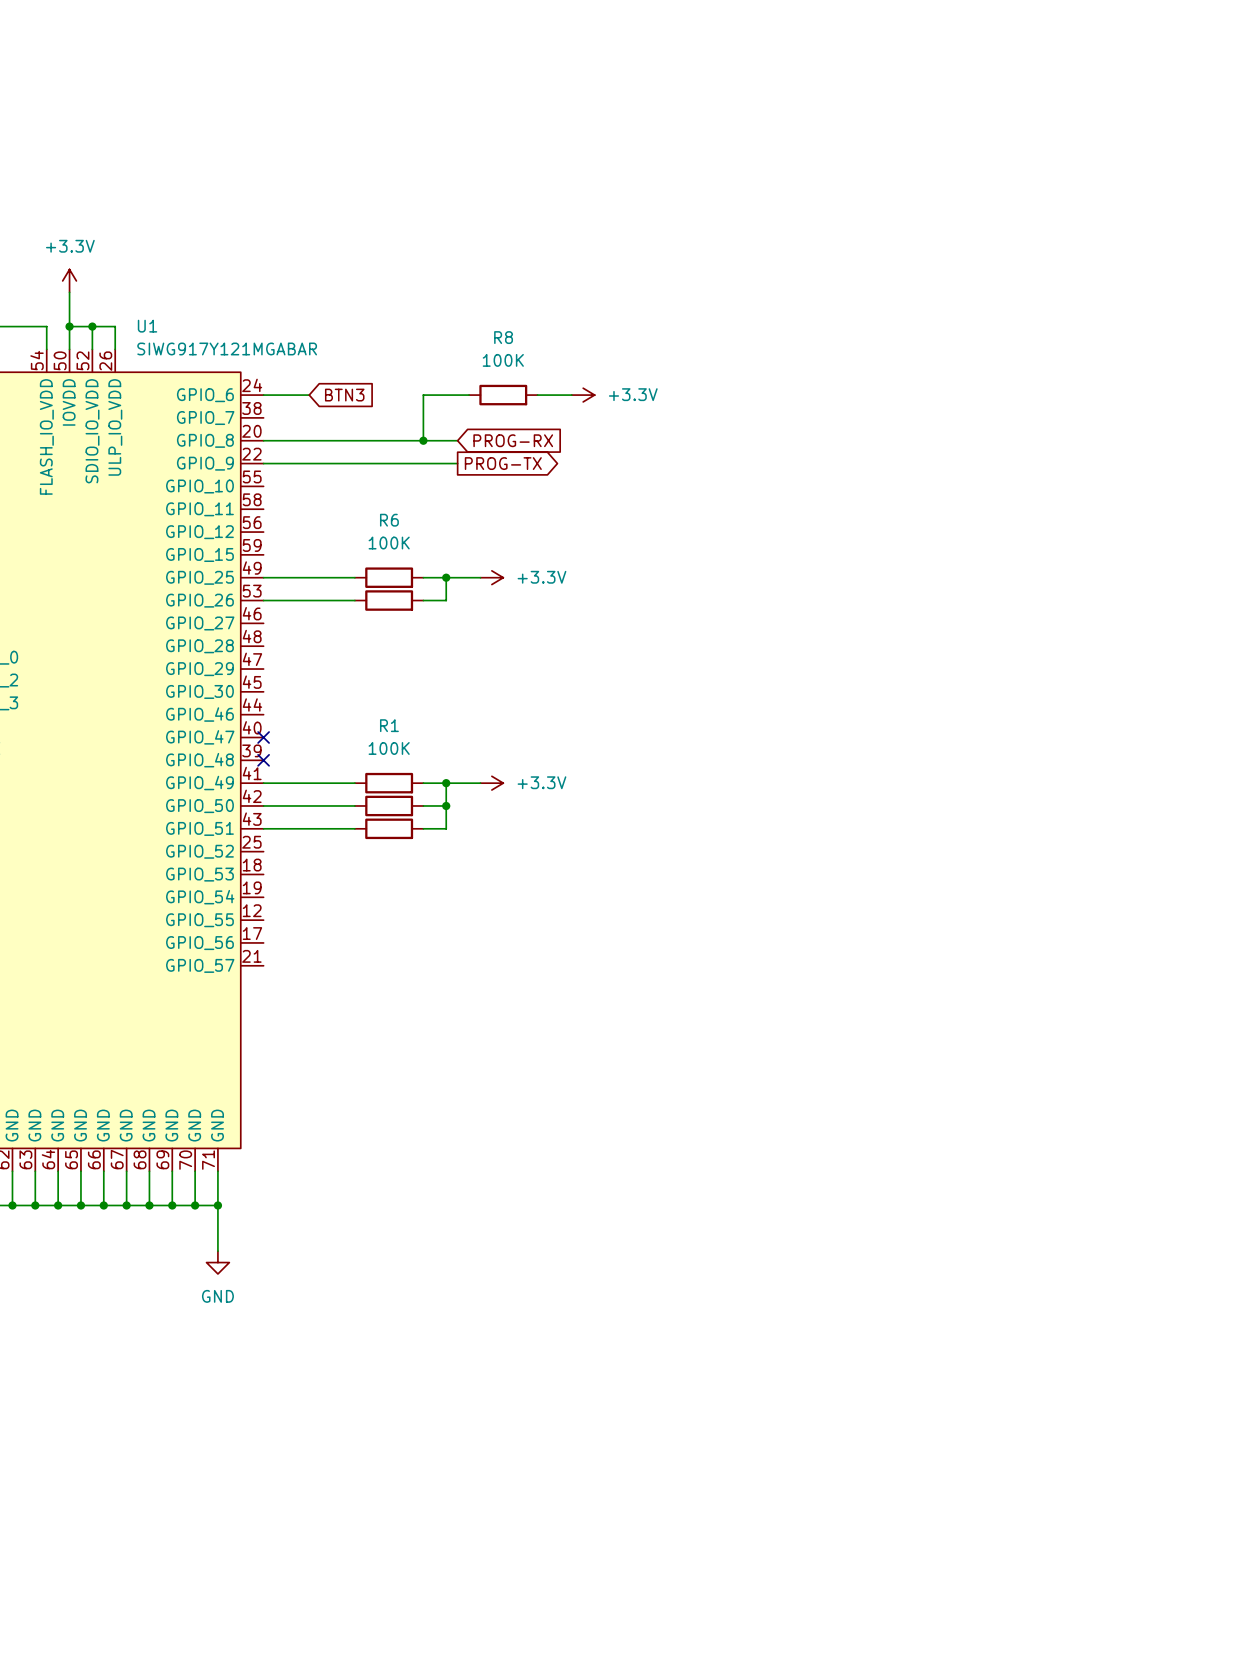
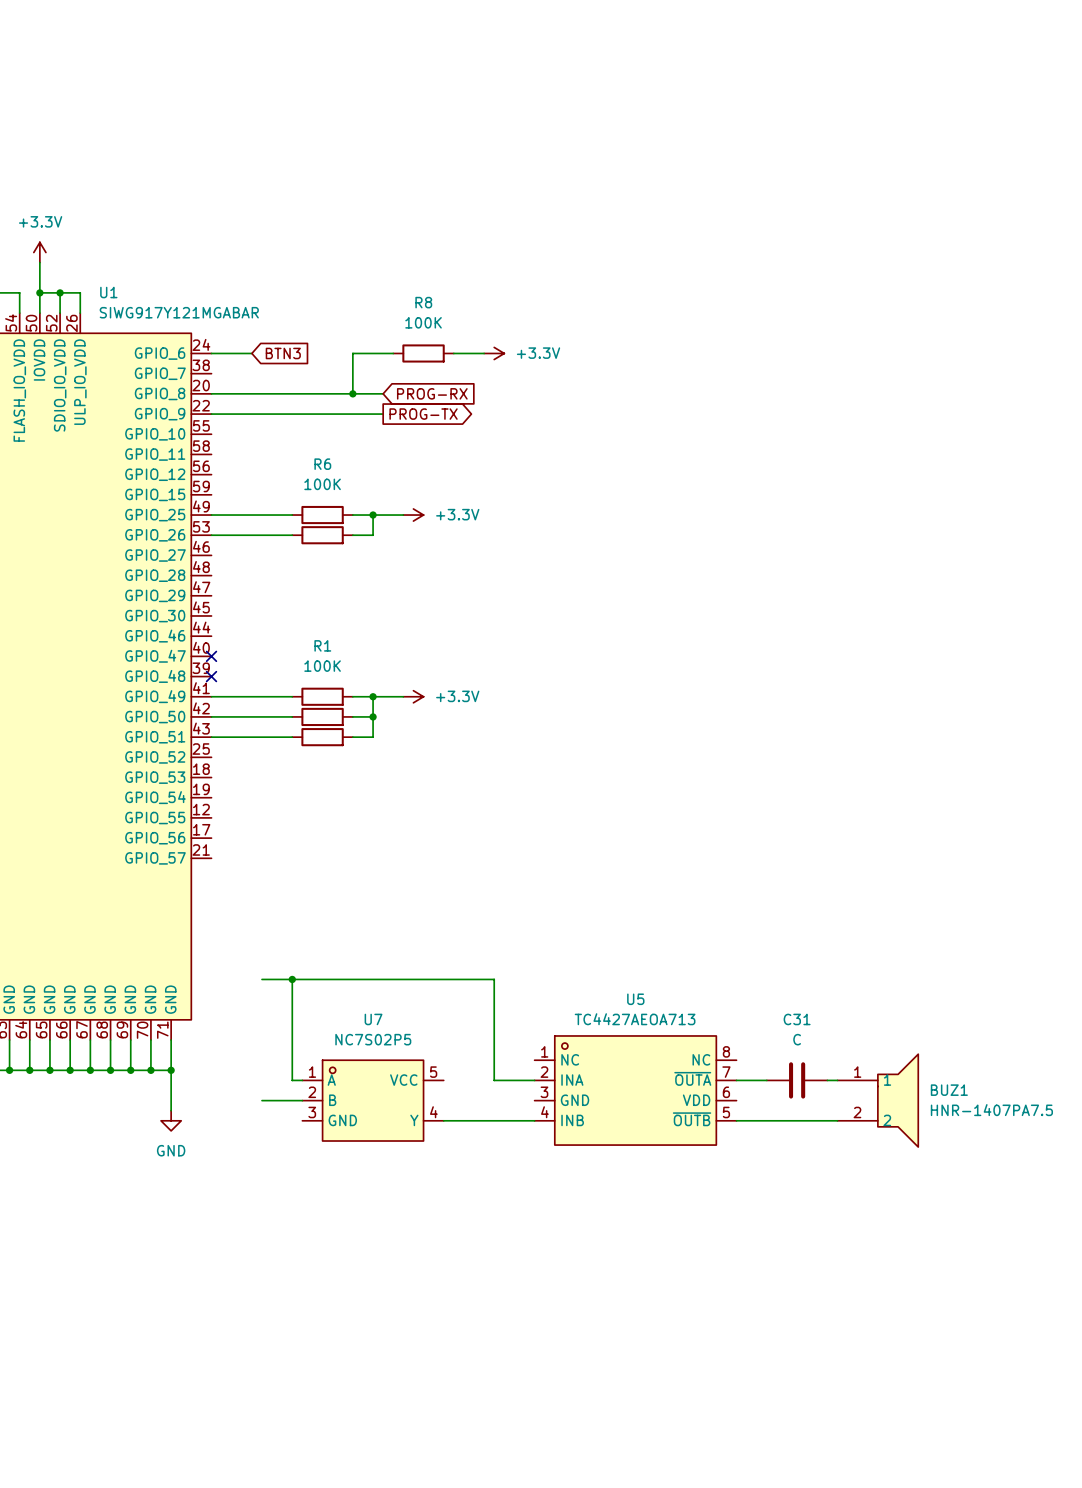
wire: none -> (261, 979) (494, 979) (494, 1080) (534, 1080)
wire: none -> (292, 979) (292, 1080) (302, 1080)
junction: none -> (292, 979)
wire: none -> (736, 1080) (766, 1080)
C31: none -> C (797, 1080)
wire: none -> (827, 1080) (837, 1080)
U5: none -> TC4427AEOA713 (635, 1090)
wire: none -> (261, 1100) (302, 1100)
U7: none -> NC7S02P5 (373, 1100)
BUZ1: none -> HNR-1407PA7.5 (877, 1100)
wire: none -> (443, 1120) (534, 1120)
wire: none -> (736, 1120) (837, 1120)

